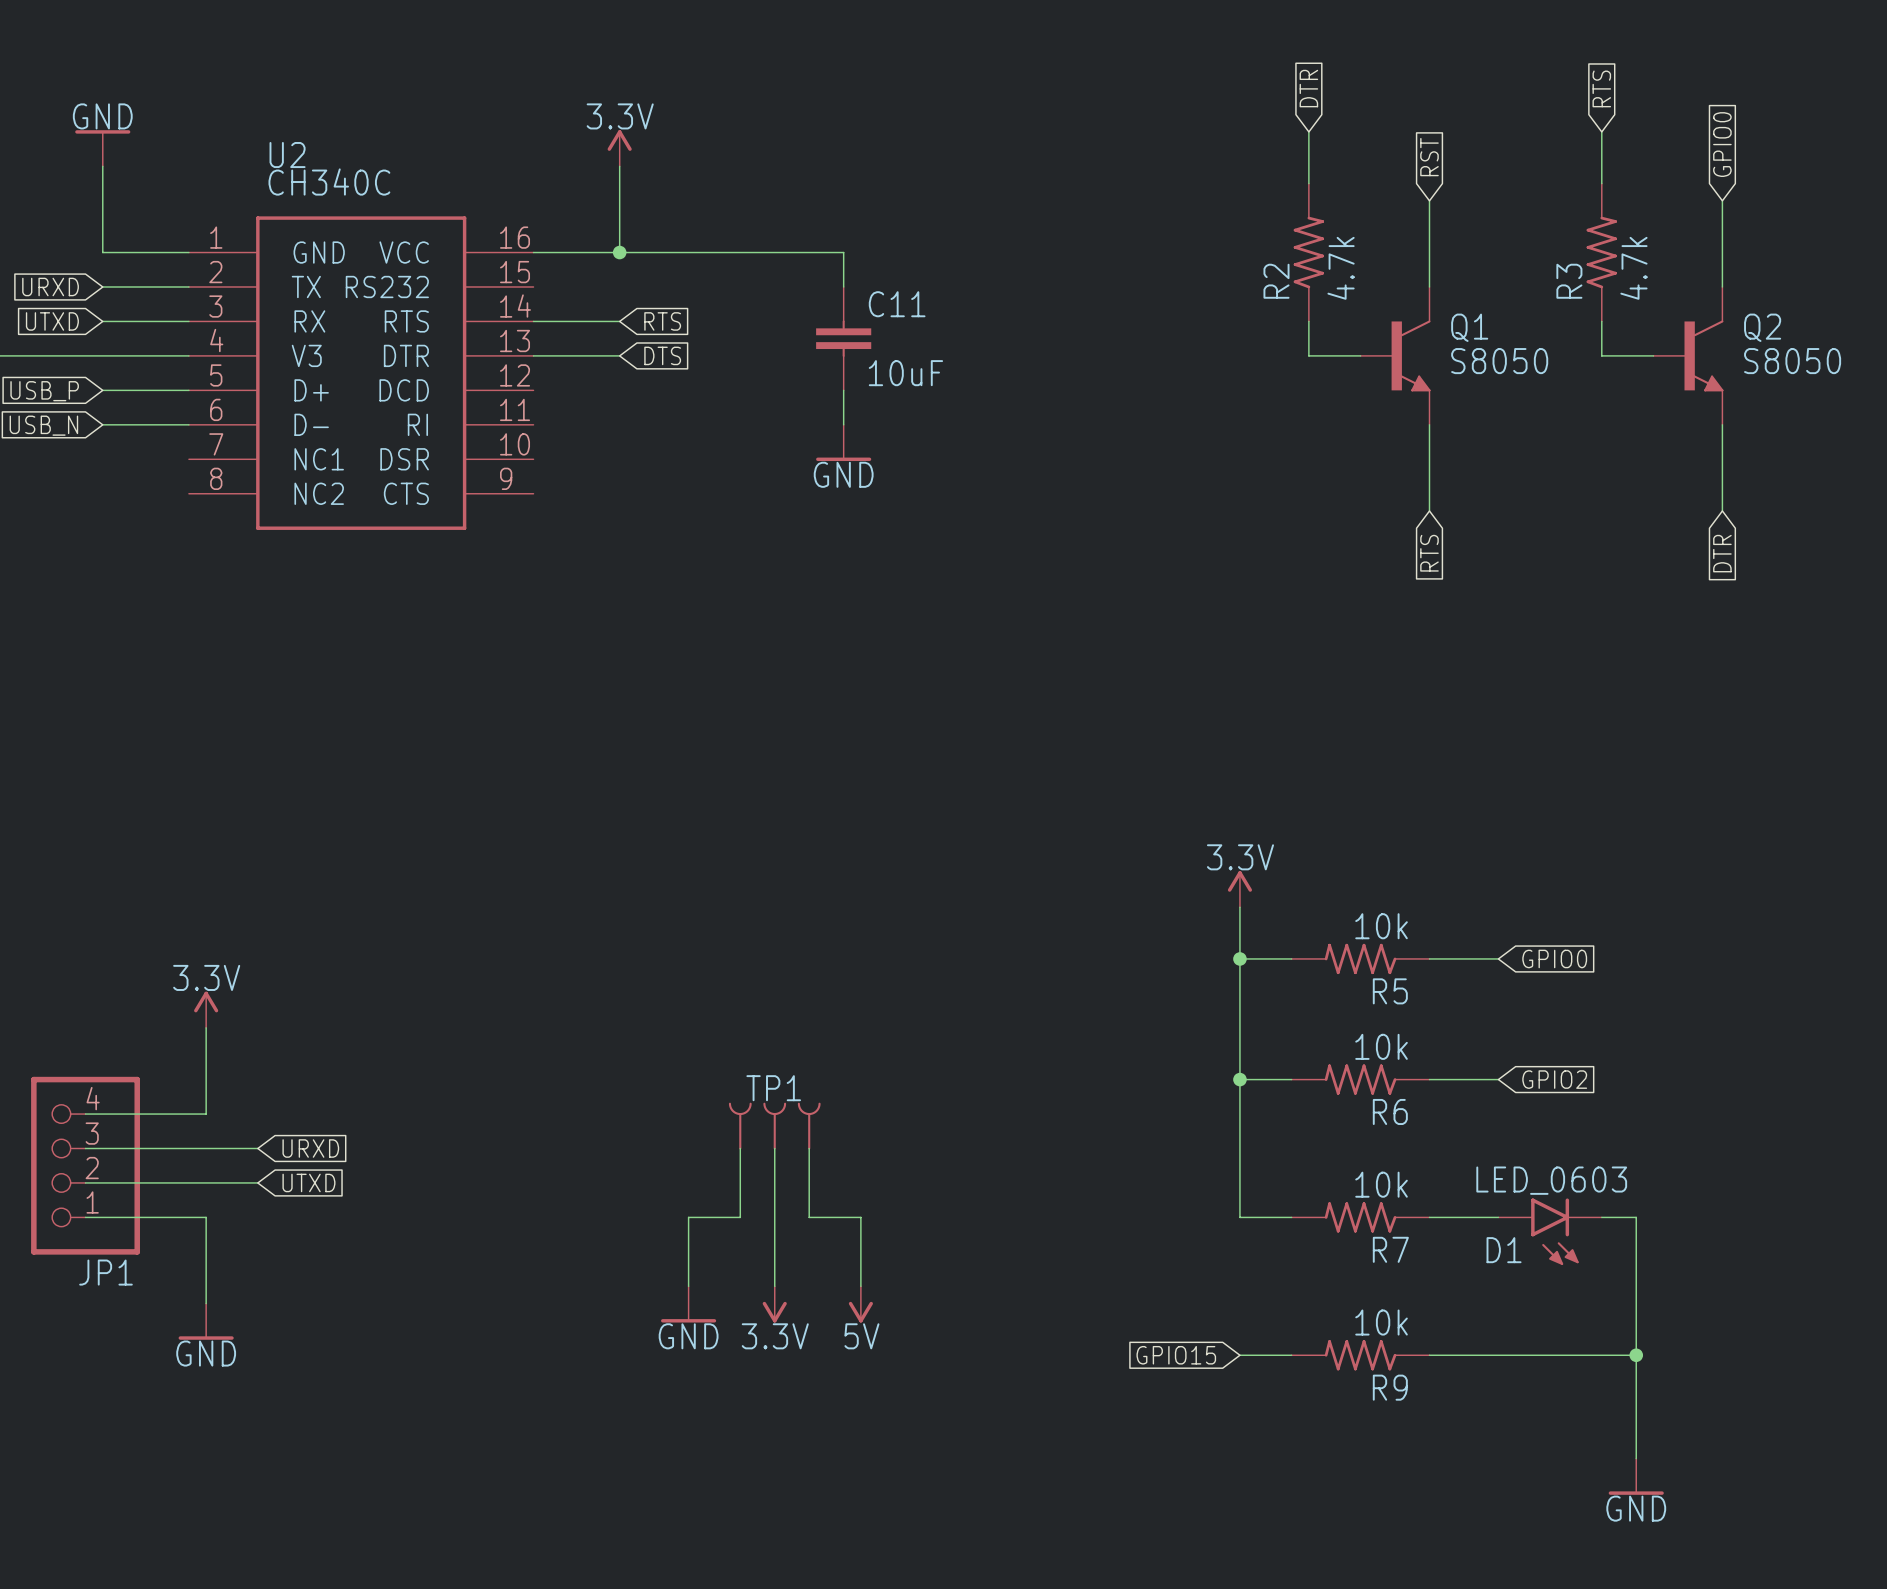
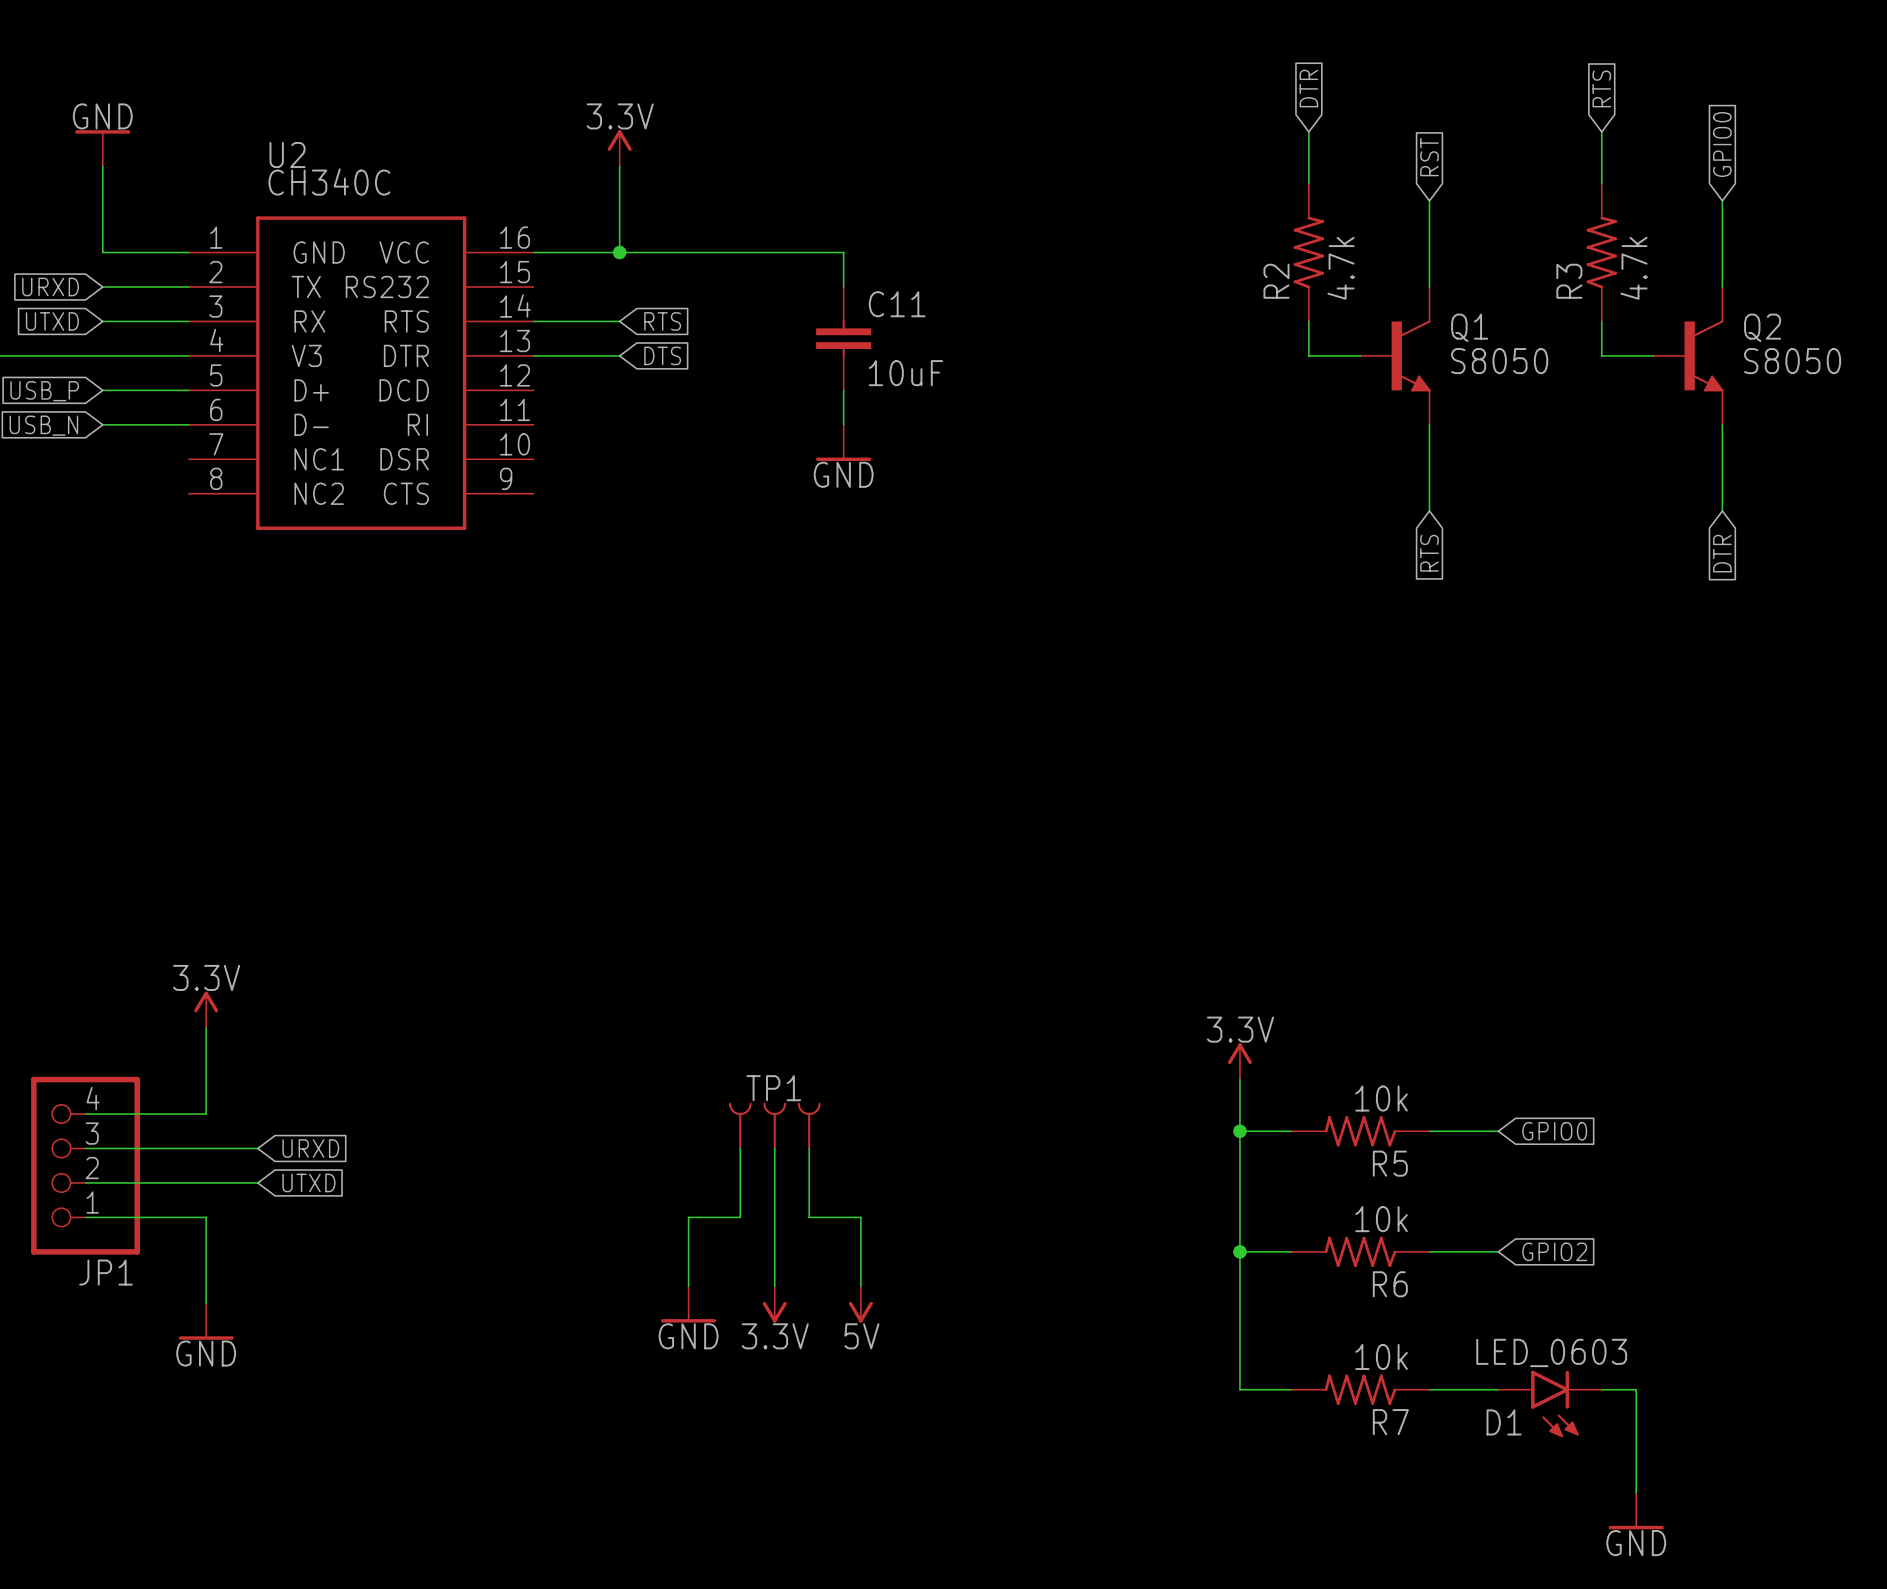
power symbol position: 3.3V (1239, 889) -> 3.3V (1239, 1061)
wire: (1239, 907) (1239, 1079) (1291, 1079) -> none
wire: (1239, 958) (1291, 958) -> (1239, 1131) (1291, 1131)
junction: (1239, 958) -> none
R5 position: (1360, 958) -> (1360, 1131)
wire: (1429, 958) (1498, 958) -> (1429, 1131) (1498, 1131)
global label position: GPIO0 (1554, 958) -> GPIO0 (1554, 1131)
junction position: (1239, 1079) -> (1239, 1131)
R6 position: (1360, 1079) -> (1360, 1251)
wire: (1429, 1079) (1498, 1079) -> (1429, 1251) (1498, 1251)
global label position: GPIO2 (1554, 1079) -> GPIO2 (1554, 1251)
wire: (1239, 1217) (1291, 1217) -> (1239, 1217) (1239, 1389) (1291, 1389)
R7 position: (1360, 1217) -> (1360, 1389)
wire: (1429, 1217) (1498, 1217) -> (1429, 1389) (1498, 1389)
wire: (1601, 1217) (1636, 1217) (1636, 1389) -> (1601, 1389) (1636, 1389)
D1 position: (1550, 1231) -> (1550, 1404)
junction: none -> (1239, 1251)
global label: GPIO15 (1176, 1355) -> none
wire: (1239, 1355) (1291, 1355) -> (1239, 1251) (1291, 1251)
R9: 10k (1360, 1355) -> none
wire: (1429, 1355) (1636, 1355) -> none
junction: (1636, 1355) -> none
power symbol position: GND (1636, 1476) -> GND (1636, 1511)

